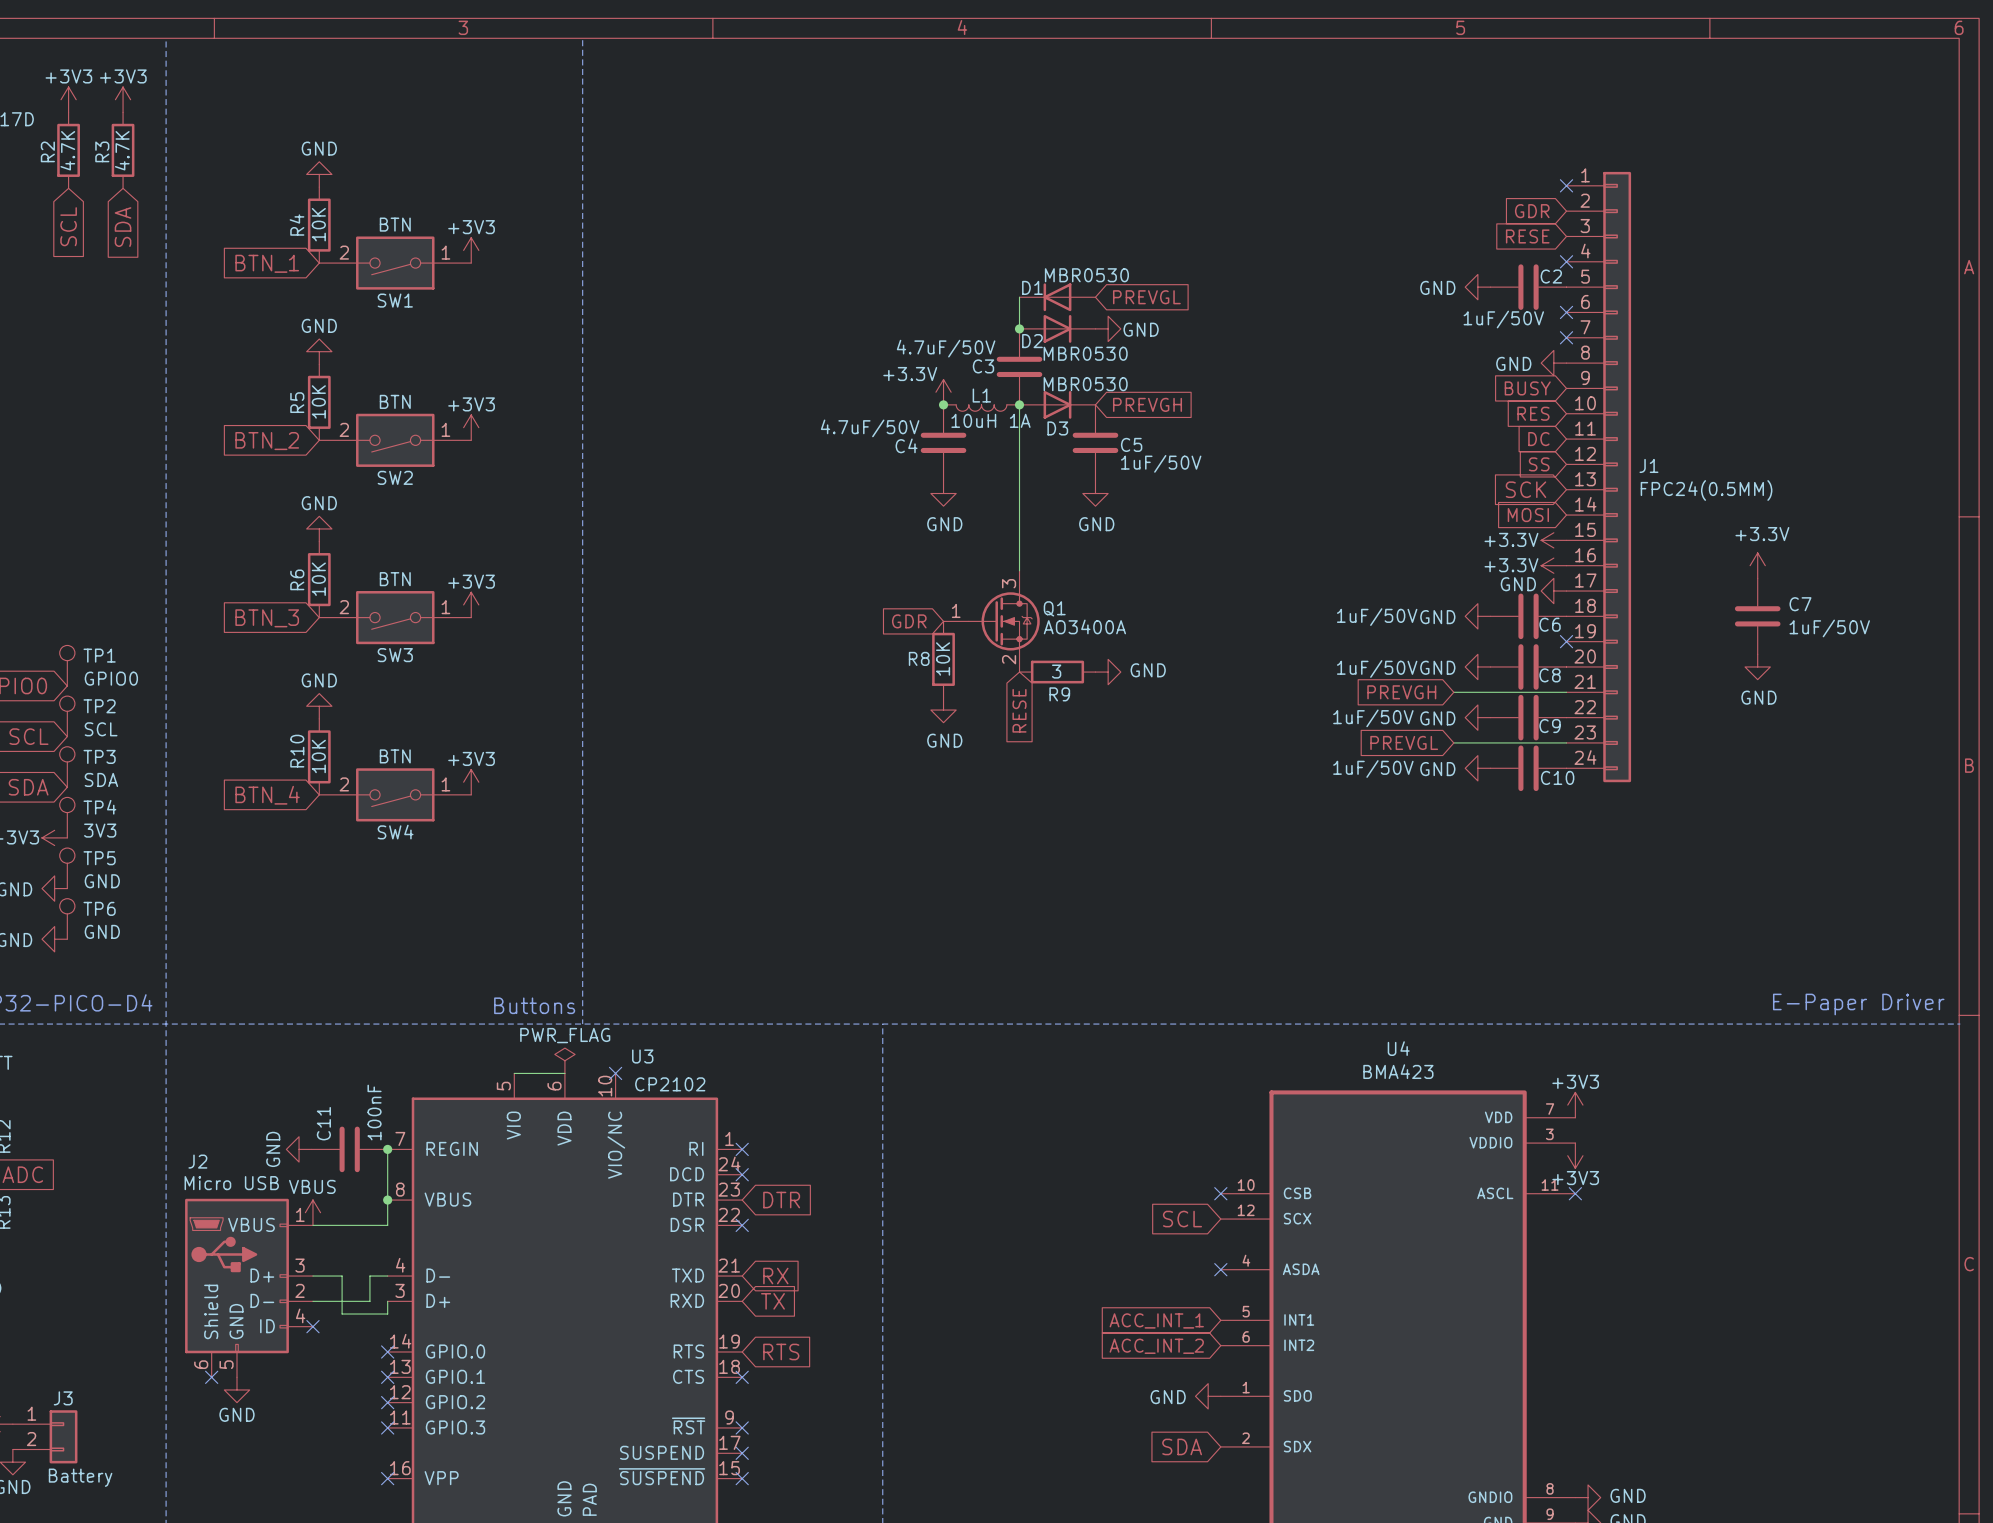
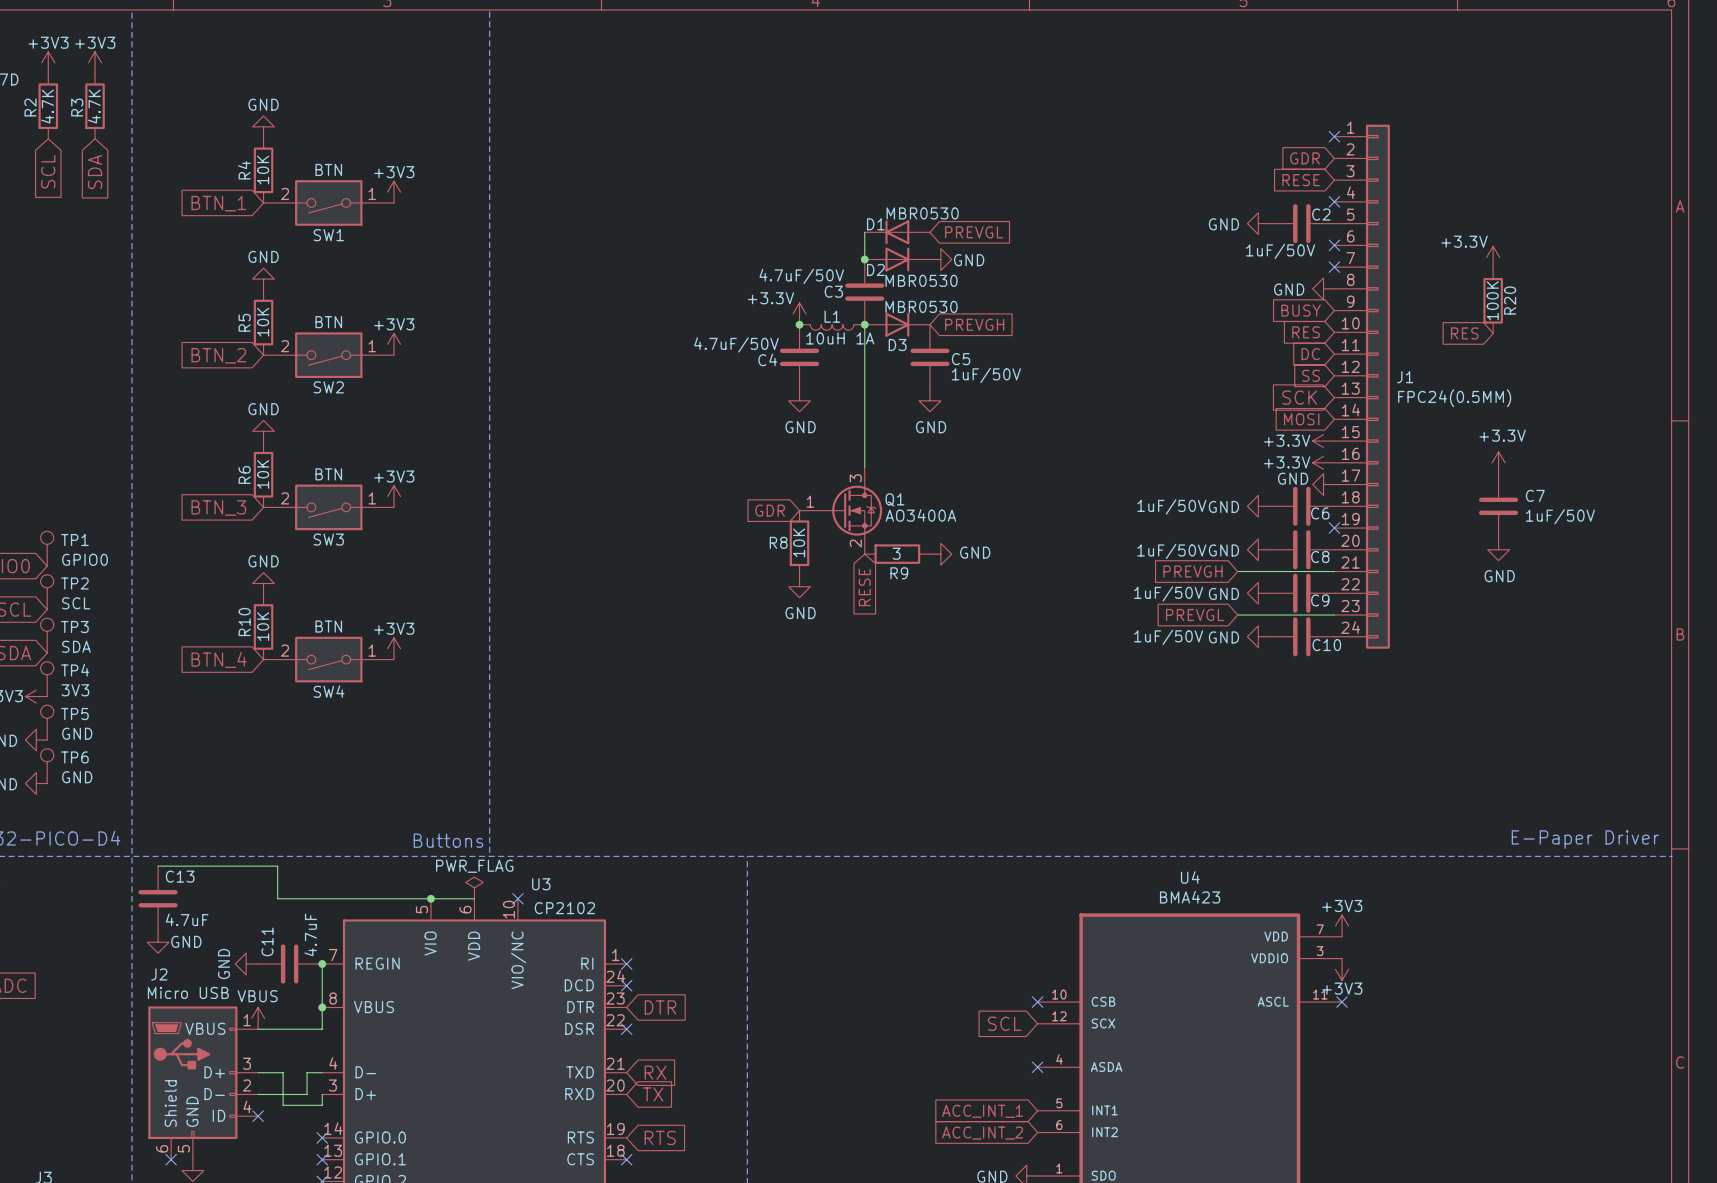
power symbol: none -> +3.3V (1493, 257)
R20: none -> 100K (1493, 300)
global label: none -> RES (1464, 333)
wire: none -> (158, 866) (277, 866) (277, 898) (430, 898)
C13: none -> 4.7uF (158, 898)
junction: none -> (430, 898)
C11 value: 100nF (374, 1112) -> 4.7uF (310, 934)
power symbol: none -> GND (158, 942)

